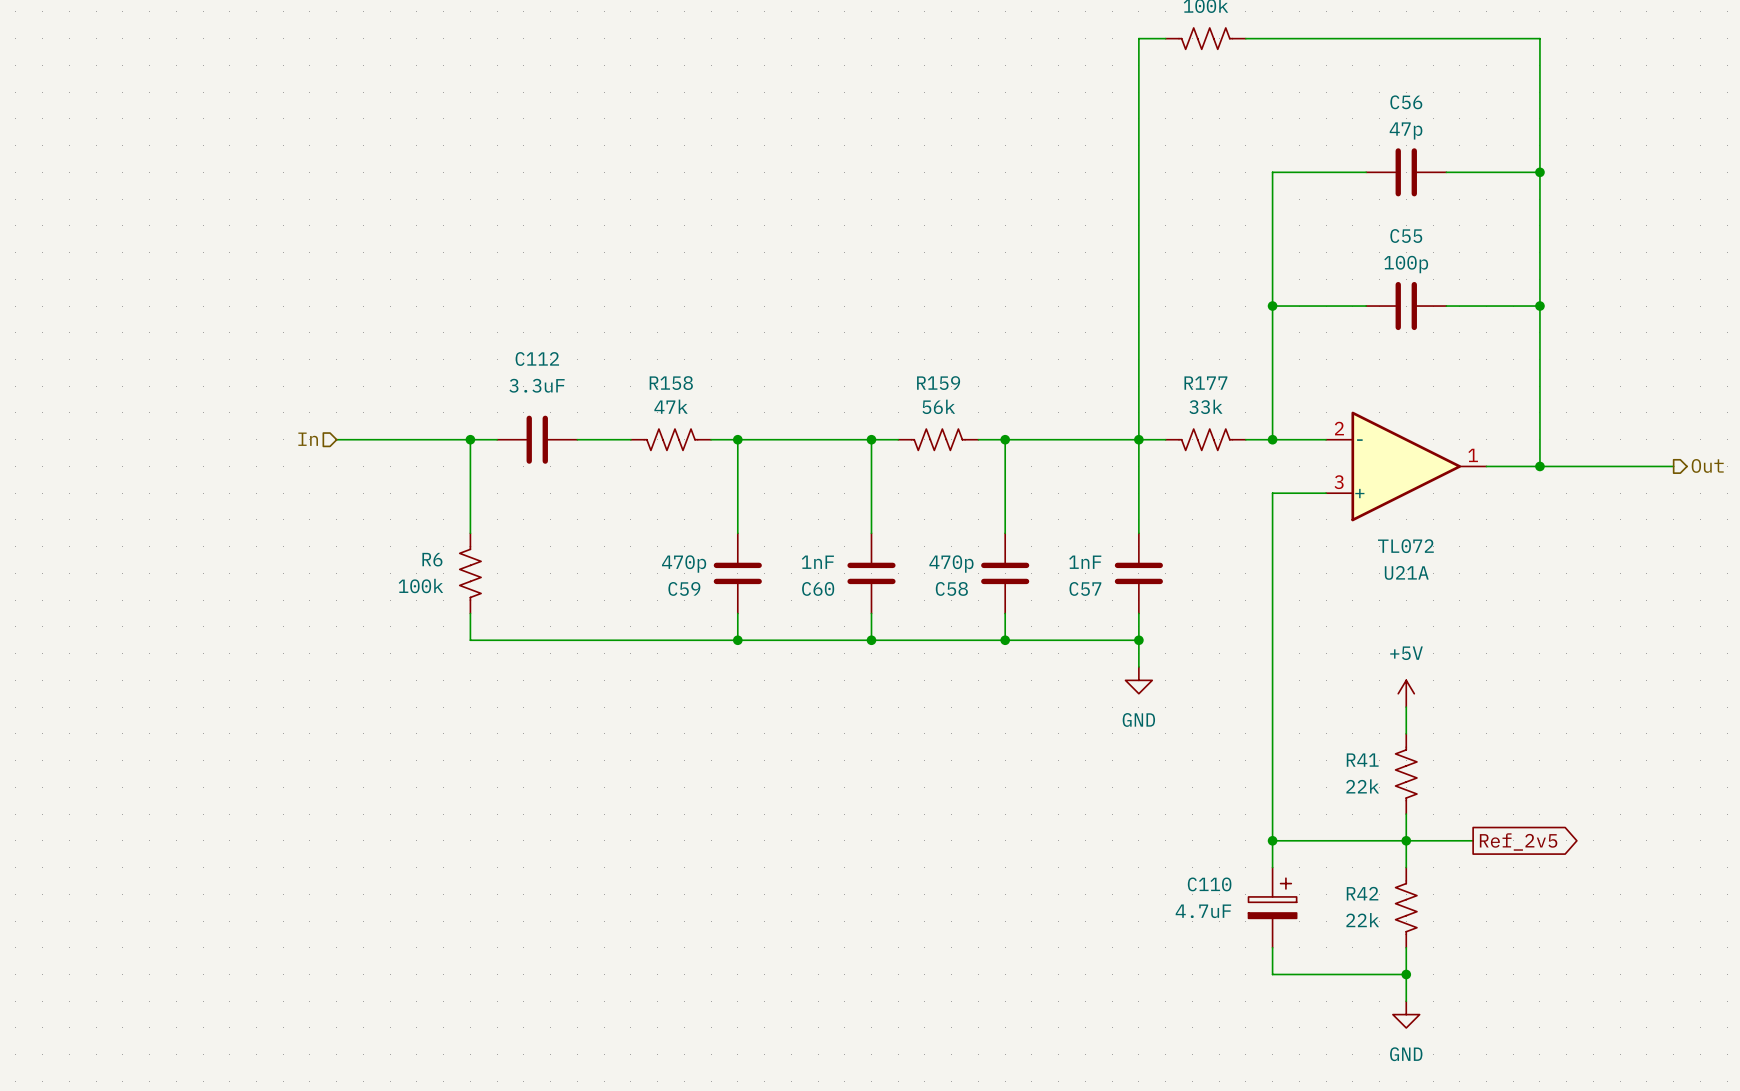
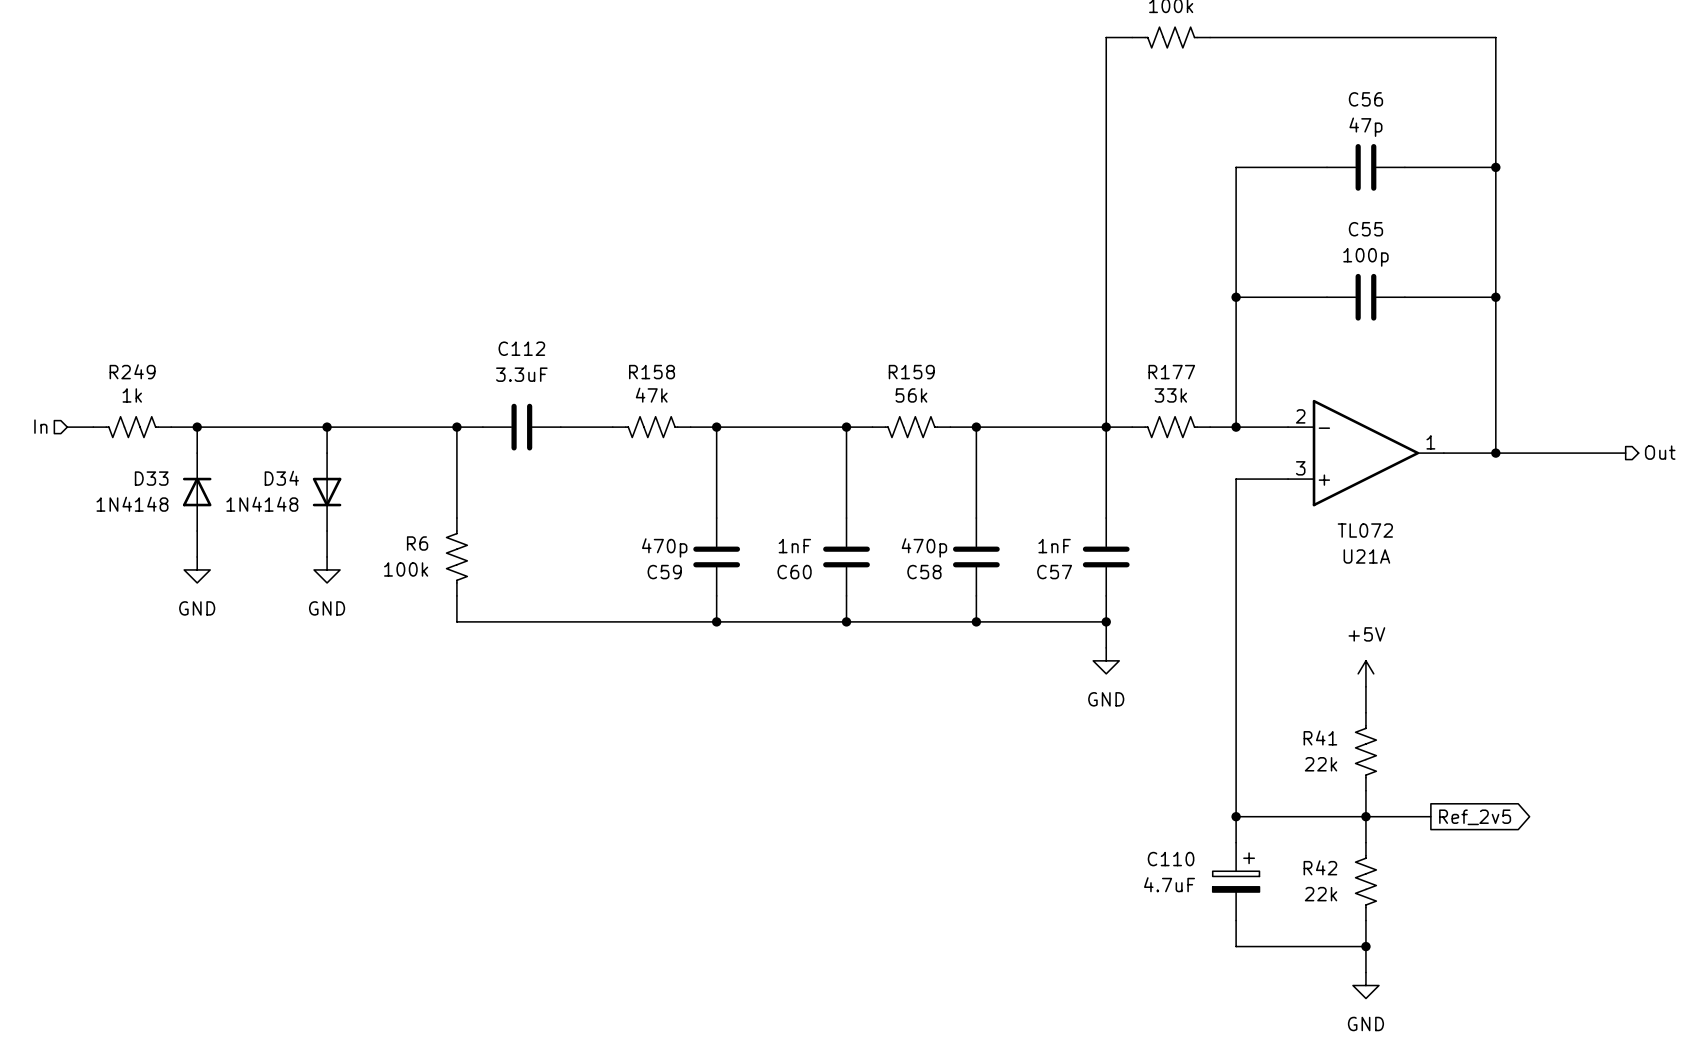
hierarchical label: none -> In (40, 426)
wire: none -> (67, 427) (93, 427)
R249: none -> 1k (132, 427)
wire: none -> (171, 427) (327, 427) (327, 453)
wire: none -> (197, 427) (197, 453)
junction: none -> (197, 427)
hierarchical label: In (308, 439) -> none
junction: none -> (327, 427)
D33: none -> 1N4148 (197, 492)
D34: none -> 1N4148 (327, 492)
wire: none -> (197, 531) (197, 556)
wire: none -> (327, 531) (327, 556)
power symbol: none -> GND (197, 569)
power symbol: none -> GND (327, 569)

